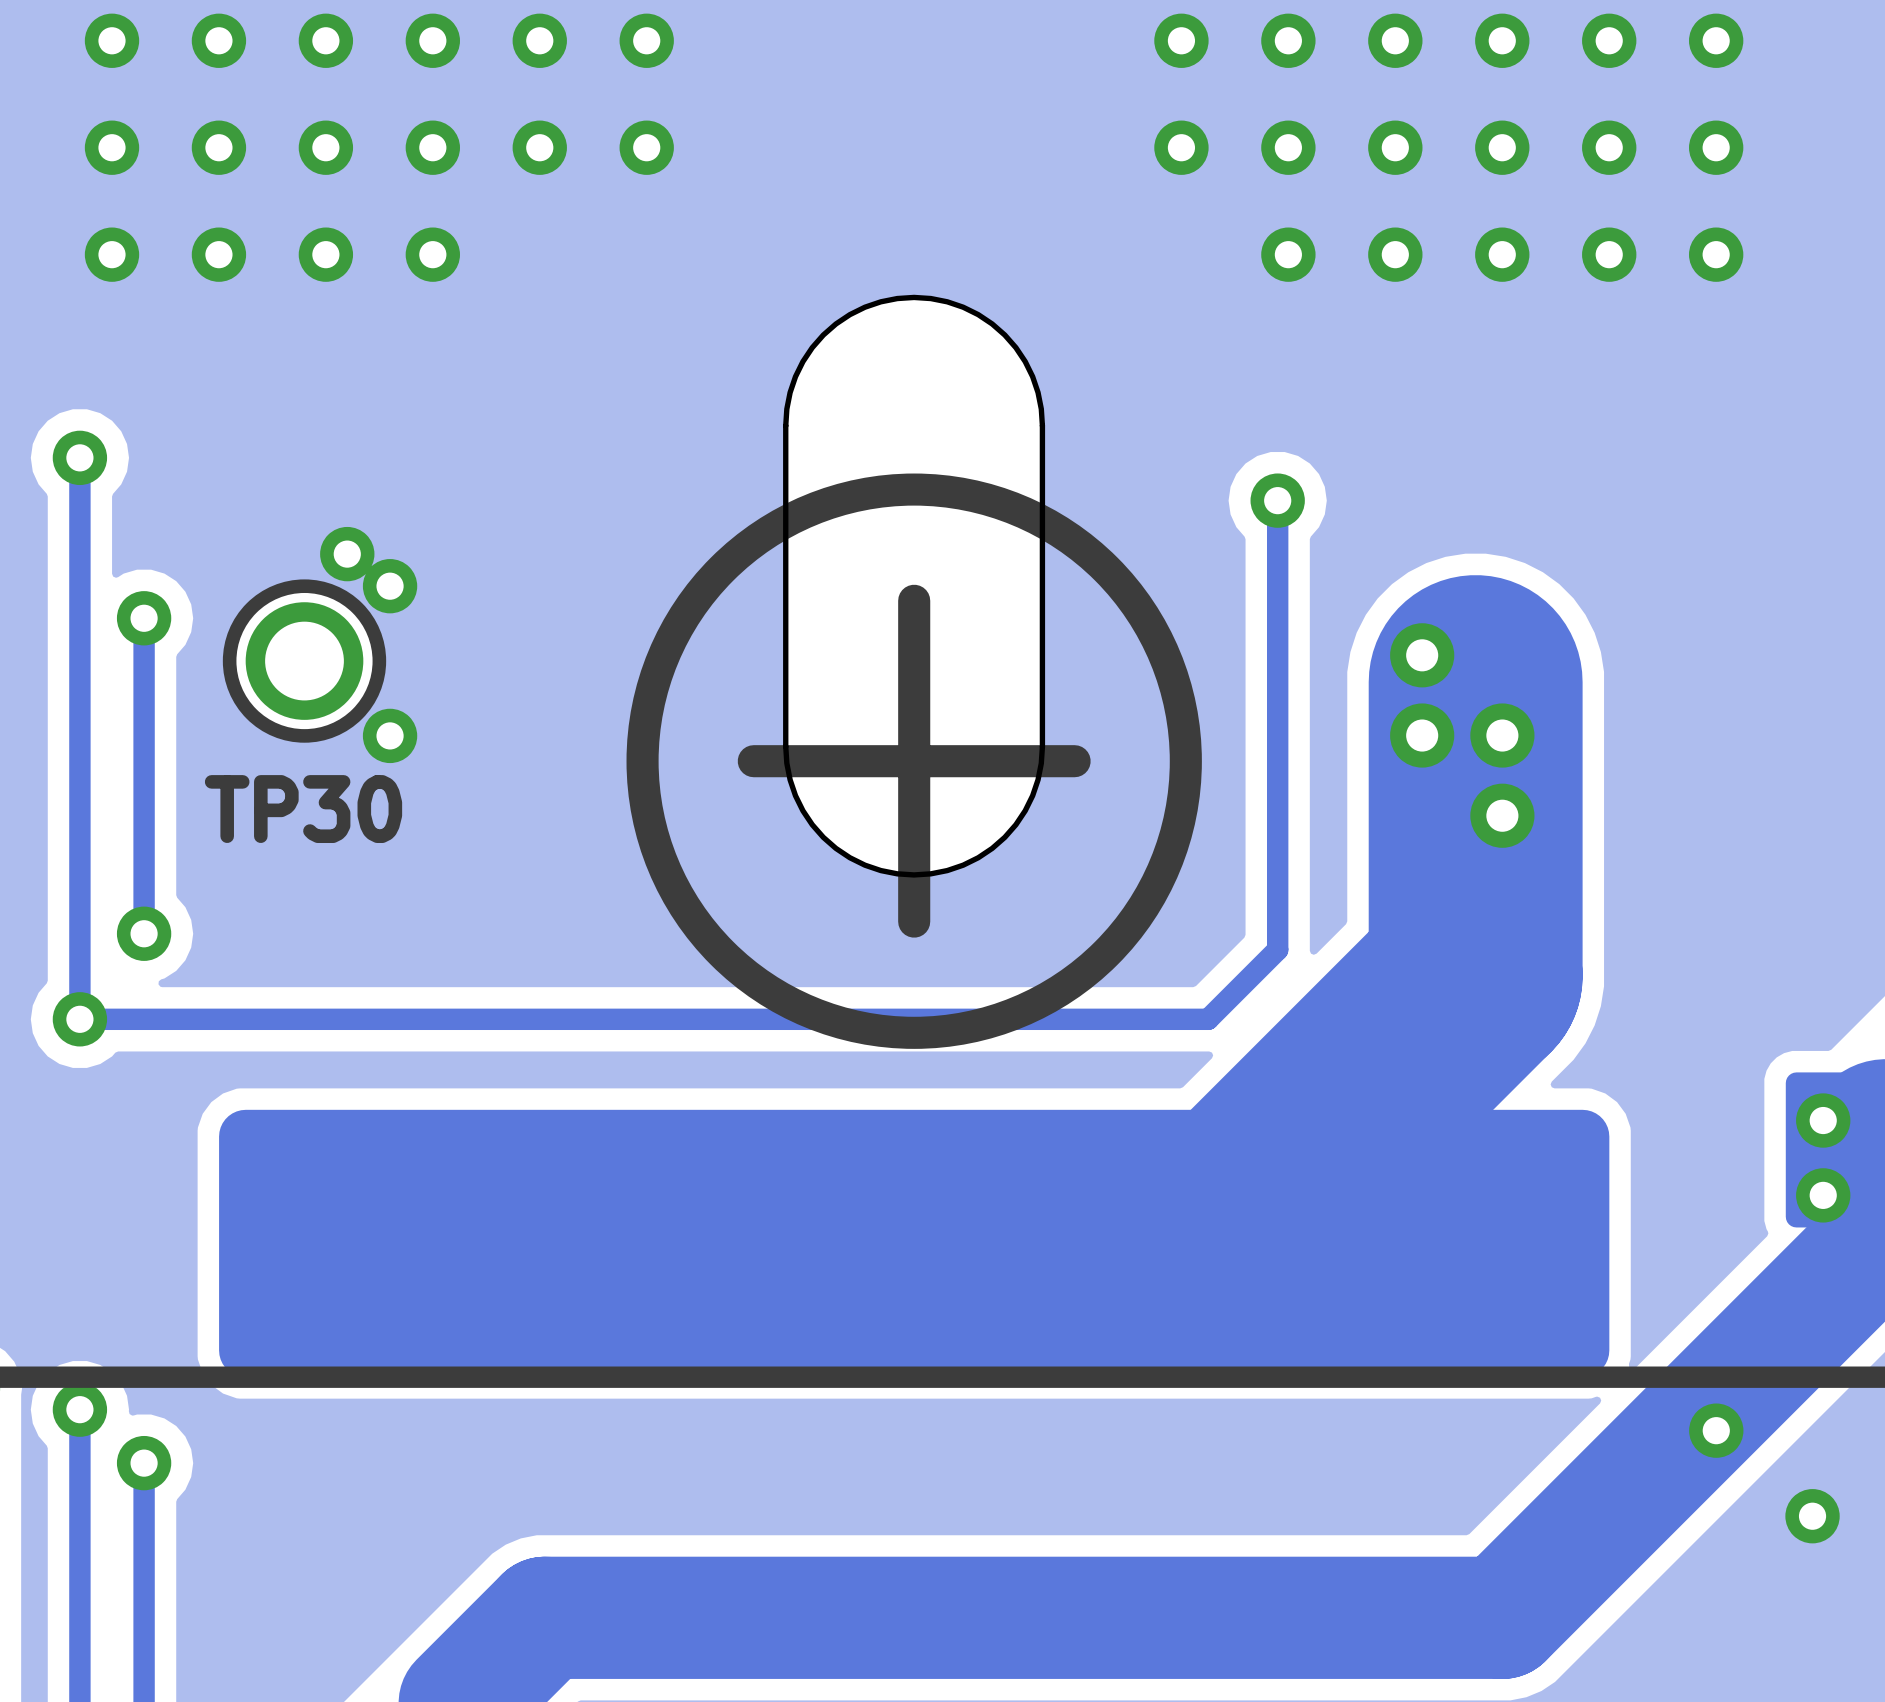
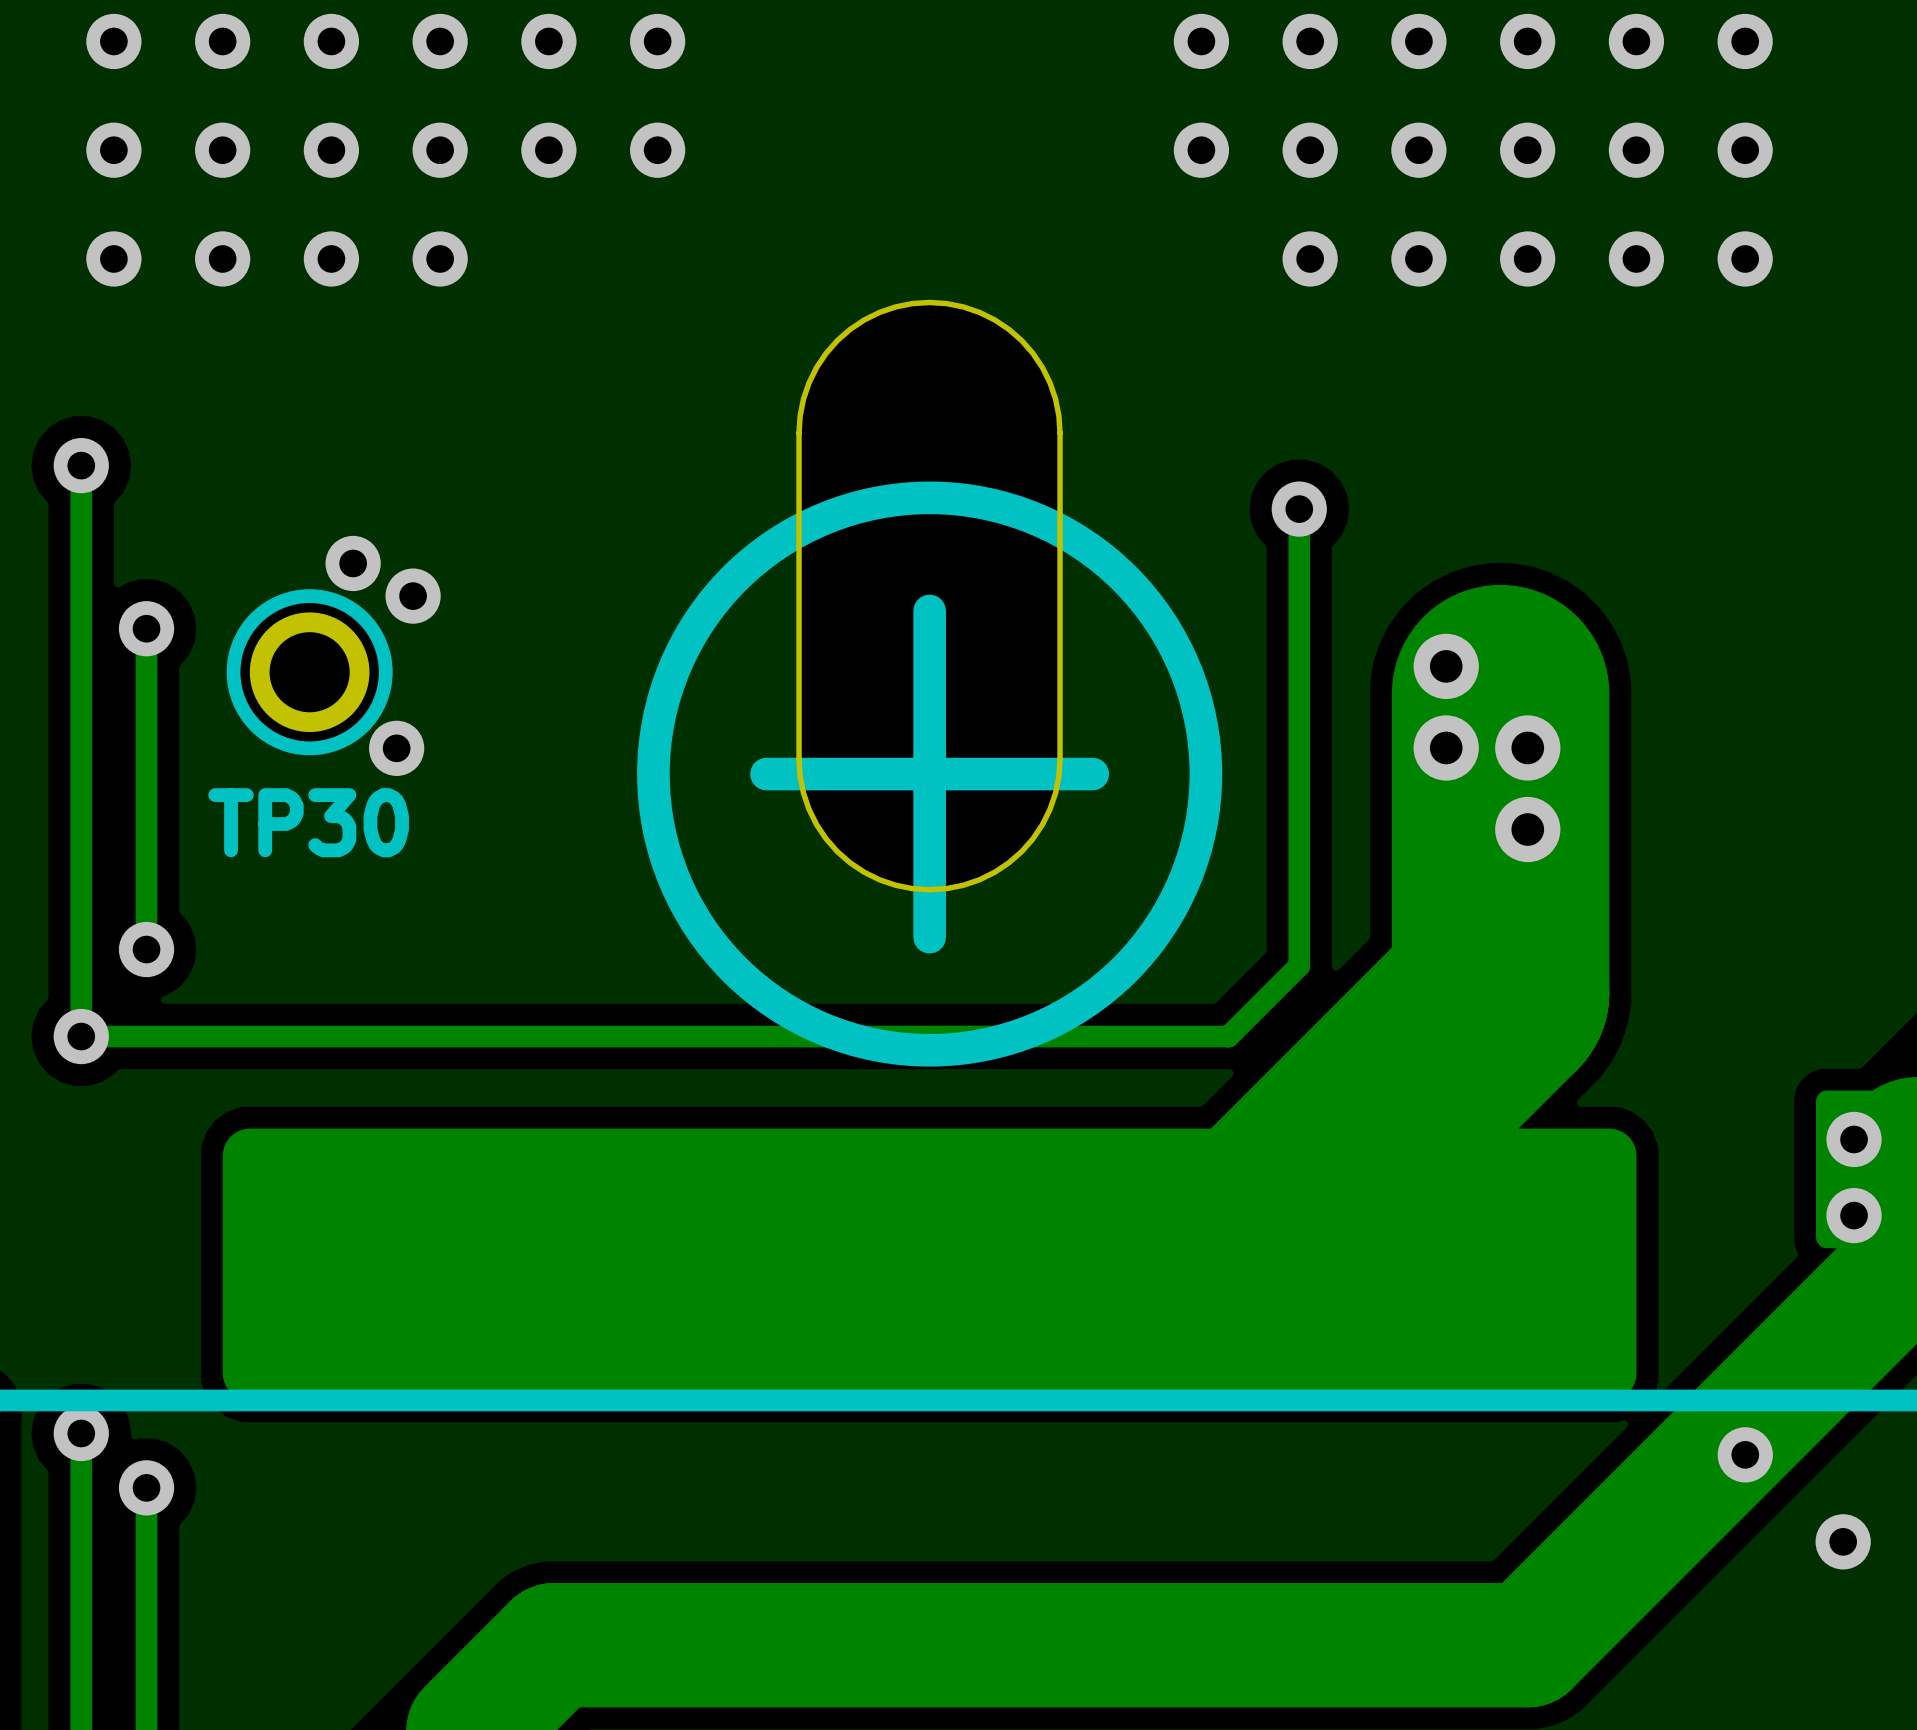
via position: (390, 586) -> (413, 596)

